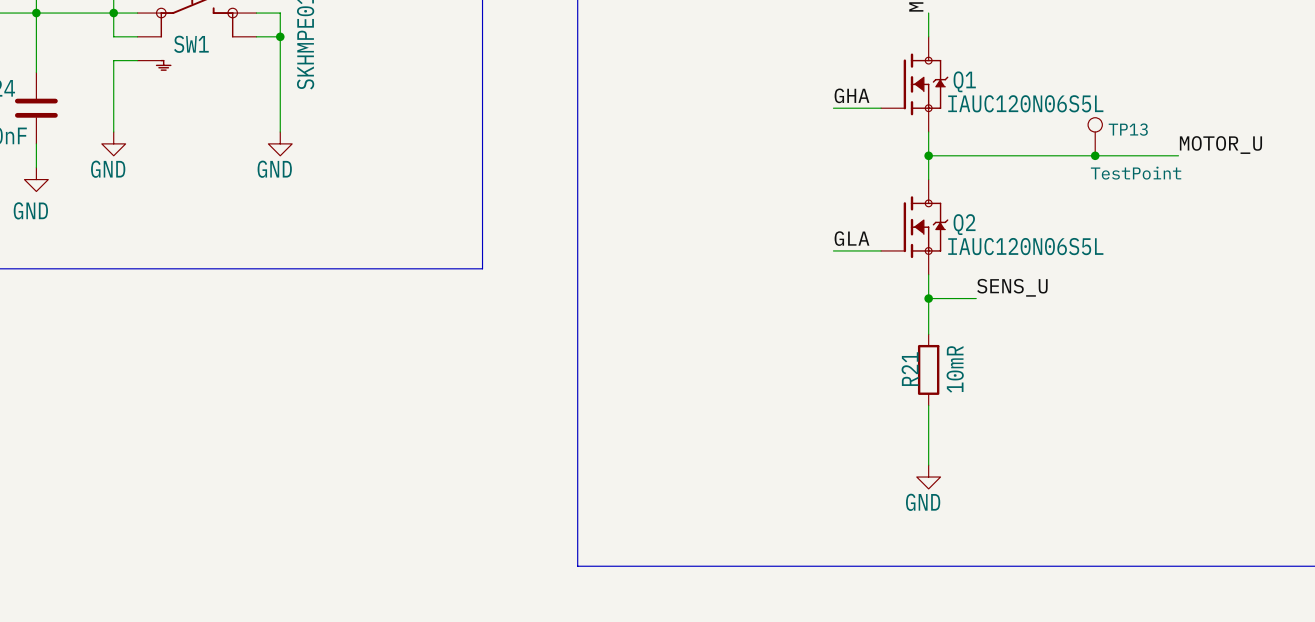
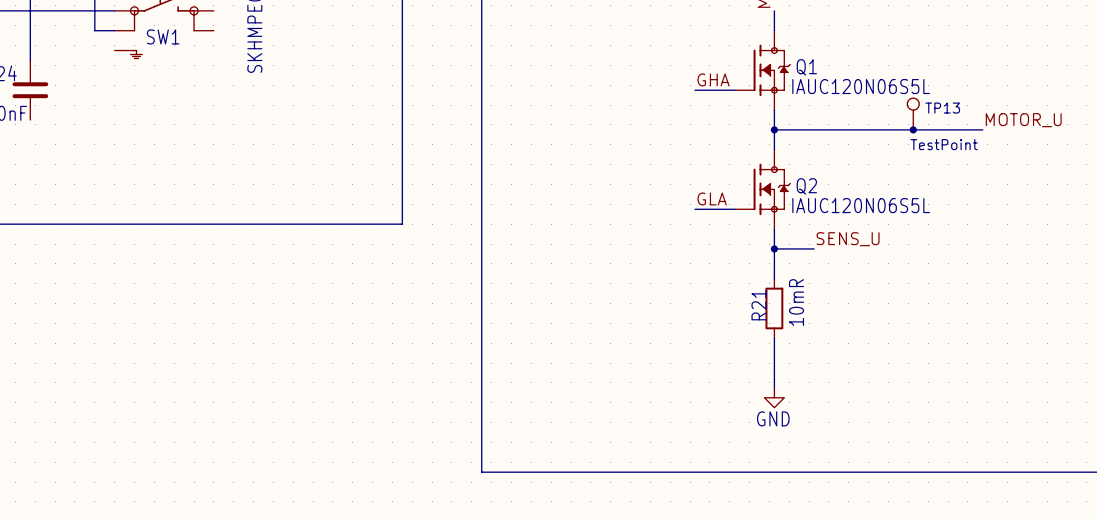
junction: (36, 13) -> none
junction: (113, 13) -> none
wire: (256, 13) (280, 13) (280, 132) -> none
wire: (256, 36) (280, 36) -> none
junction: (280, 36) -> none
wire: (137, 60) (113, 60) (113, 132) -> none
wire: (36, 143) (36, 167) -> none
power symbol: GND (113, 143) -> none
power symbol: GND (280, 143) -> none
power symbol: GND (36, 179) -> none

